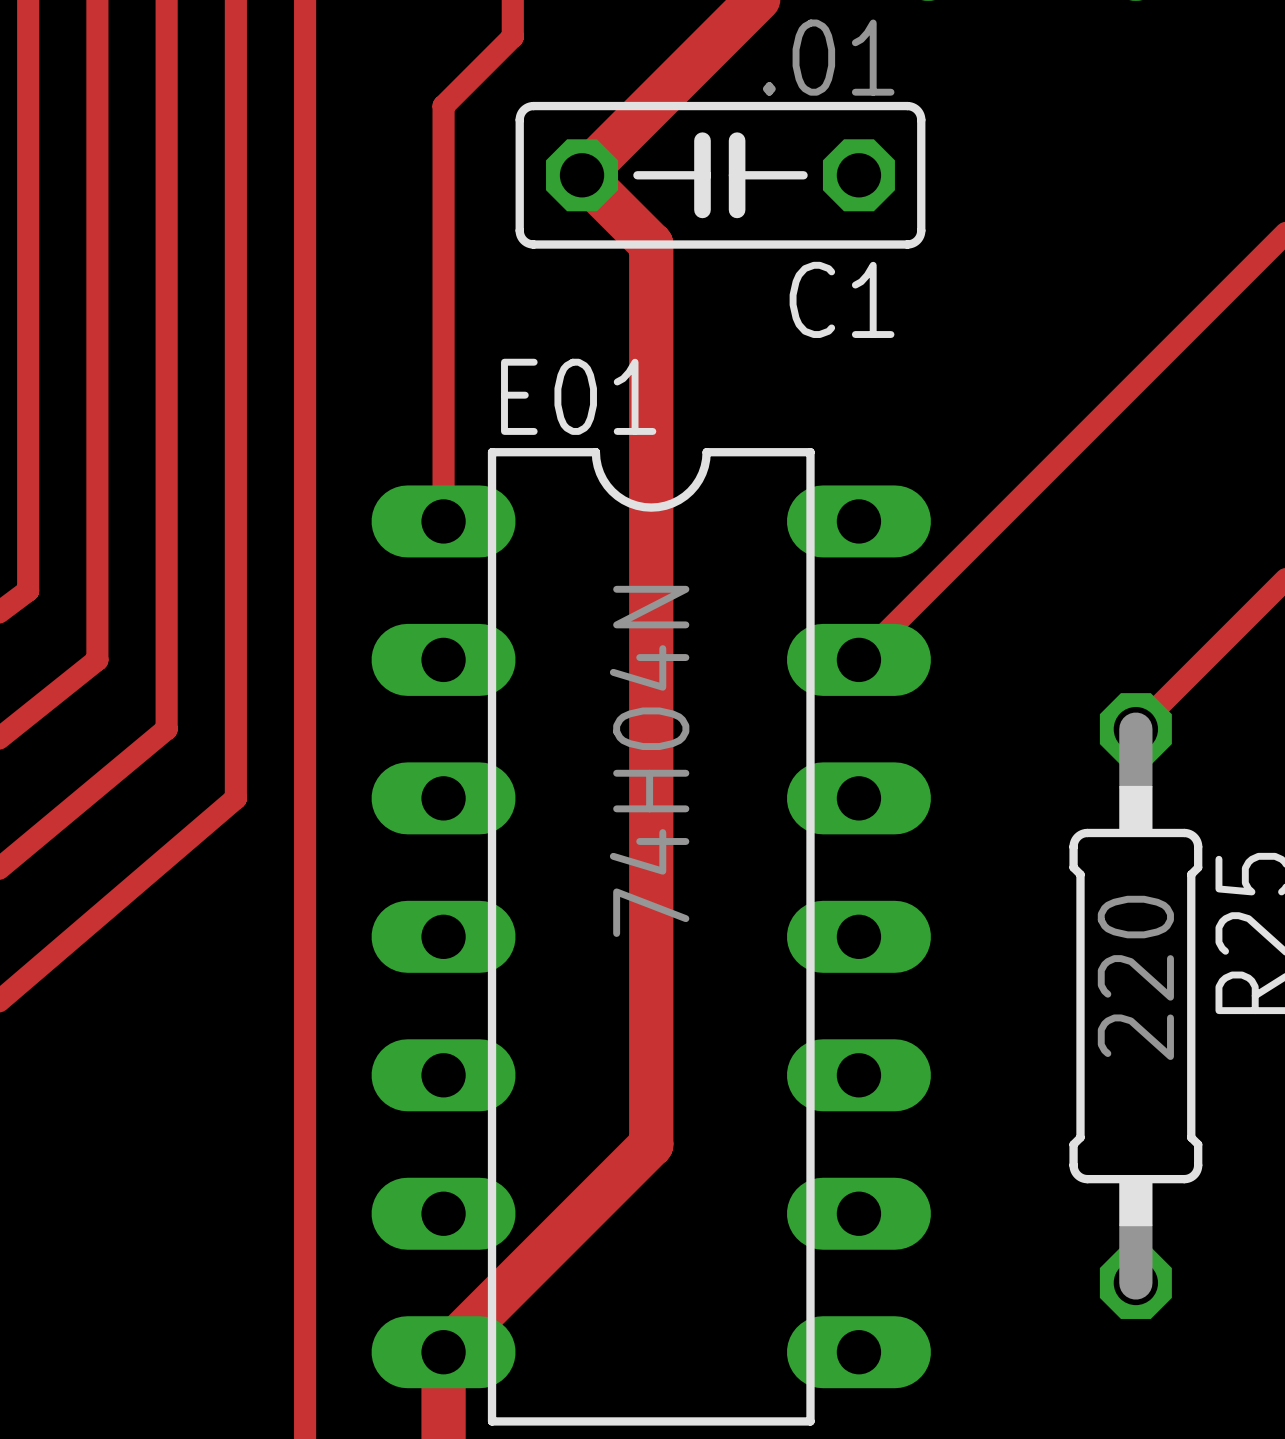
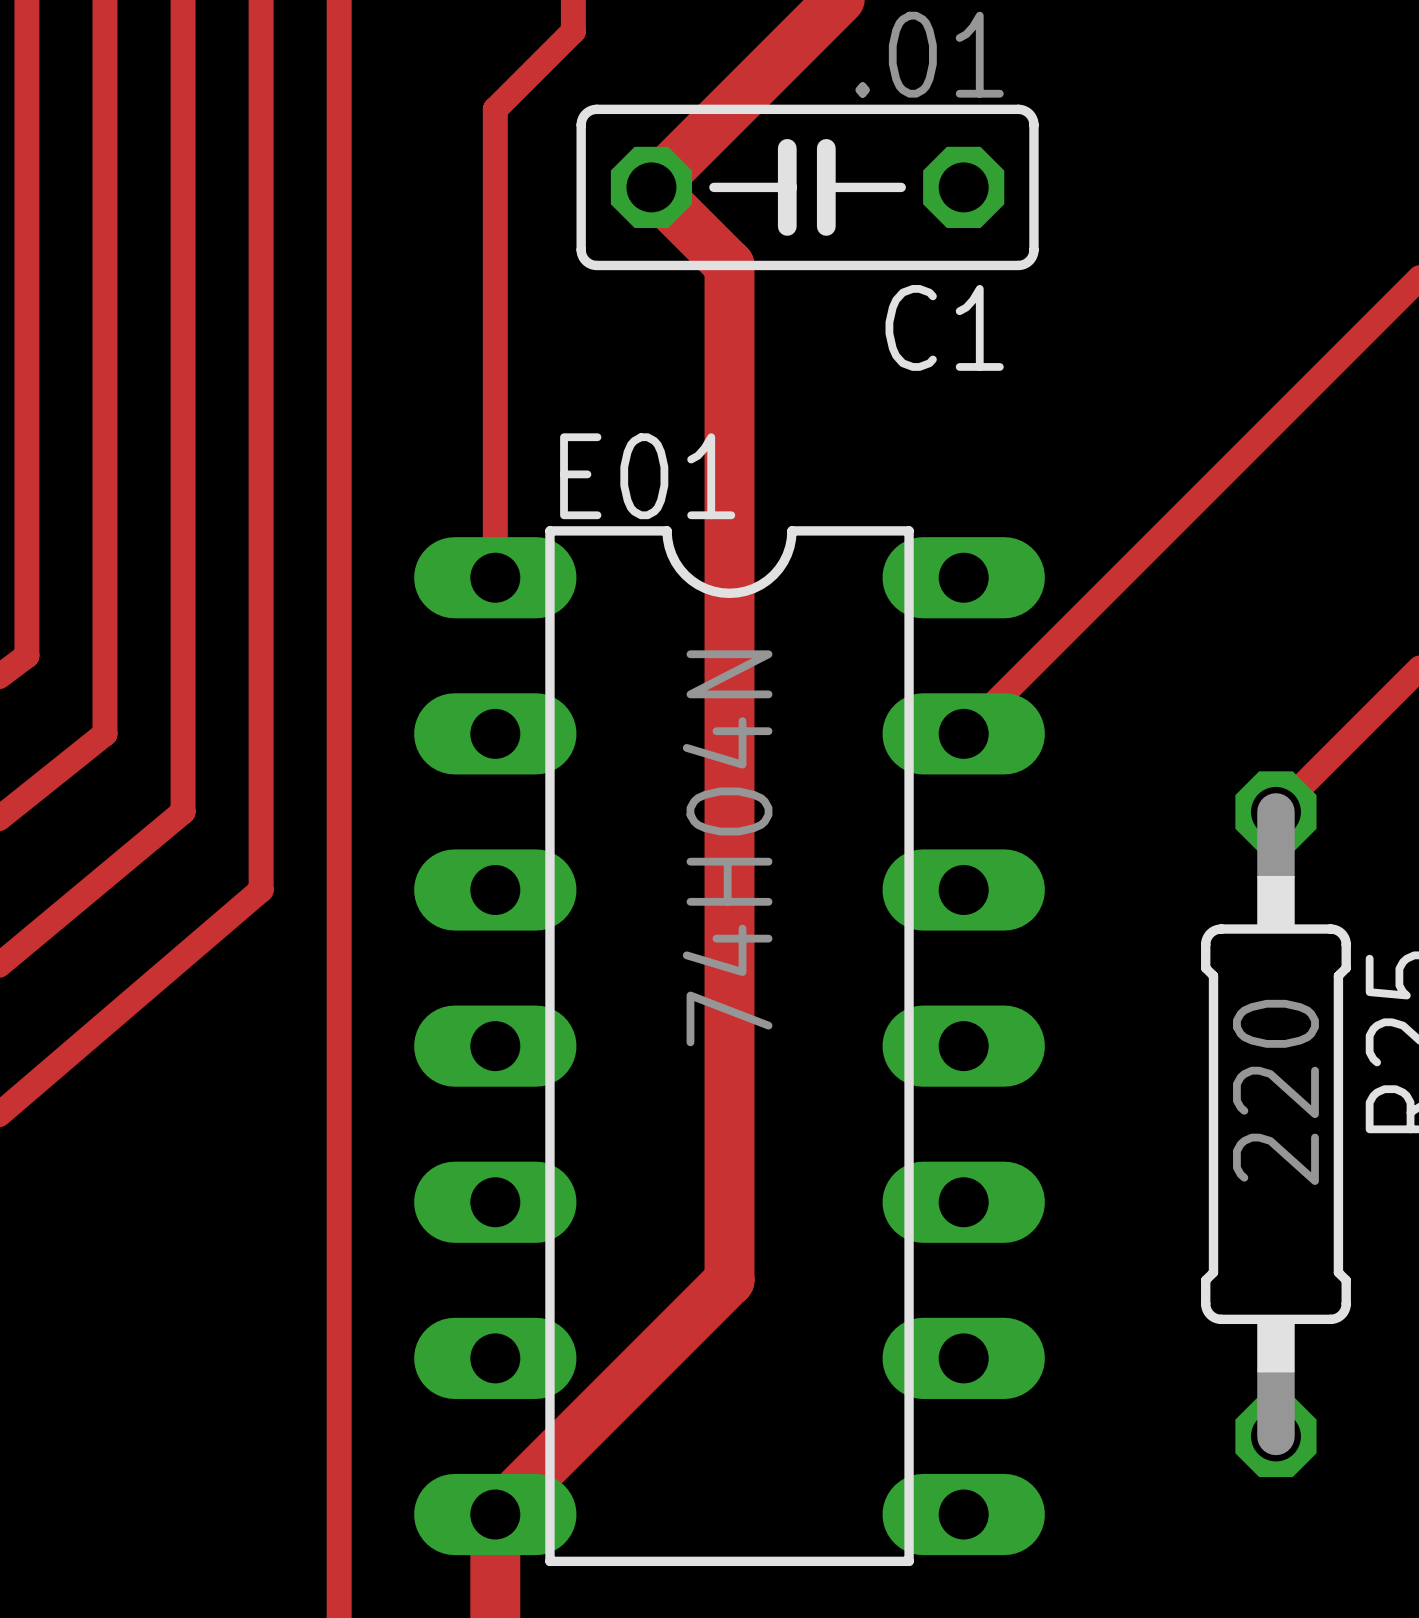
E01 name position: E01 (578, 396) -> E01 (647, 476)
E01 footprint: [371, 448, 931, 1426] -> [414, 526, 1045, 1567]

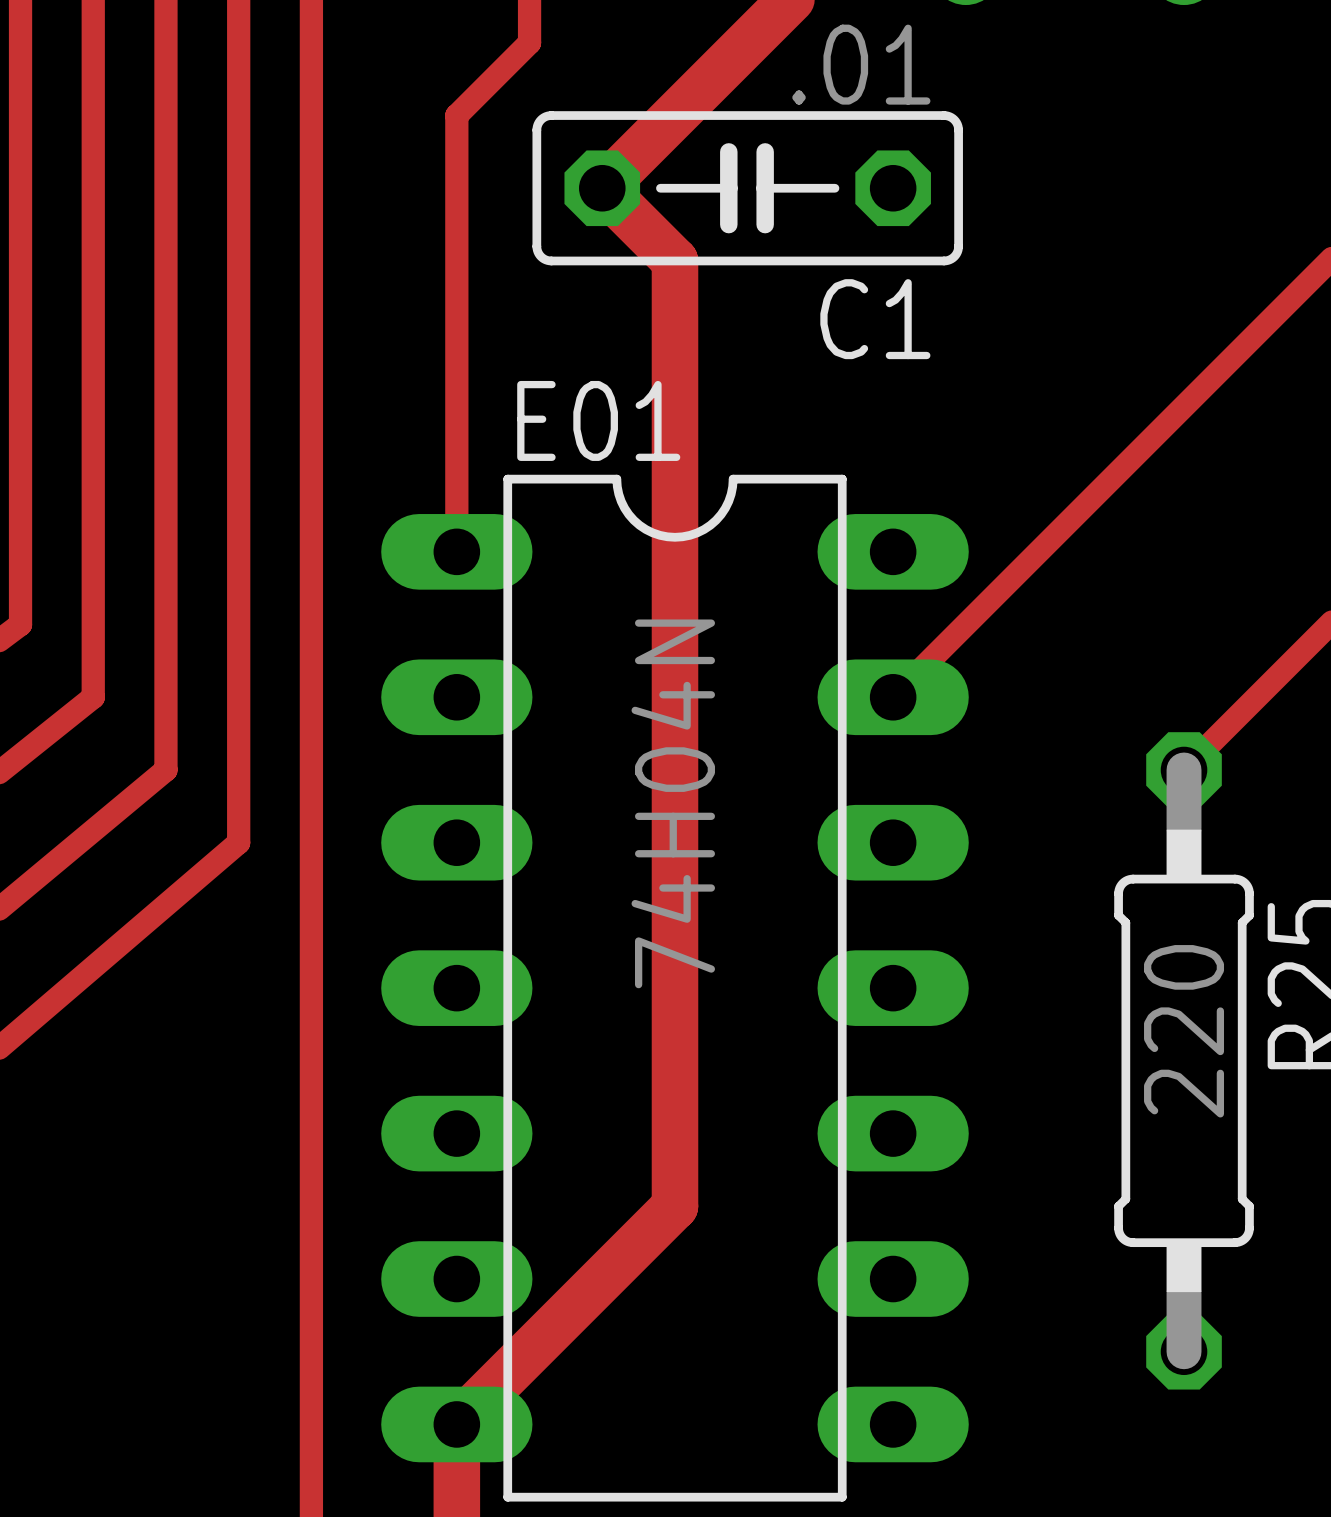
E01 name position: E01 (647, 476) -> E01 (598, 420)
E01 footprint: [414, 526, 1045, 1567] -> [381, 474, 969, 1502]

